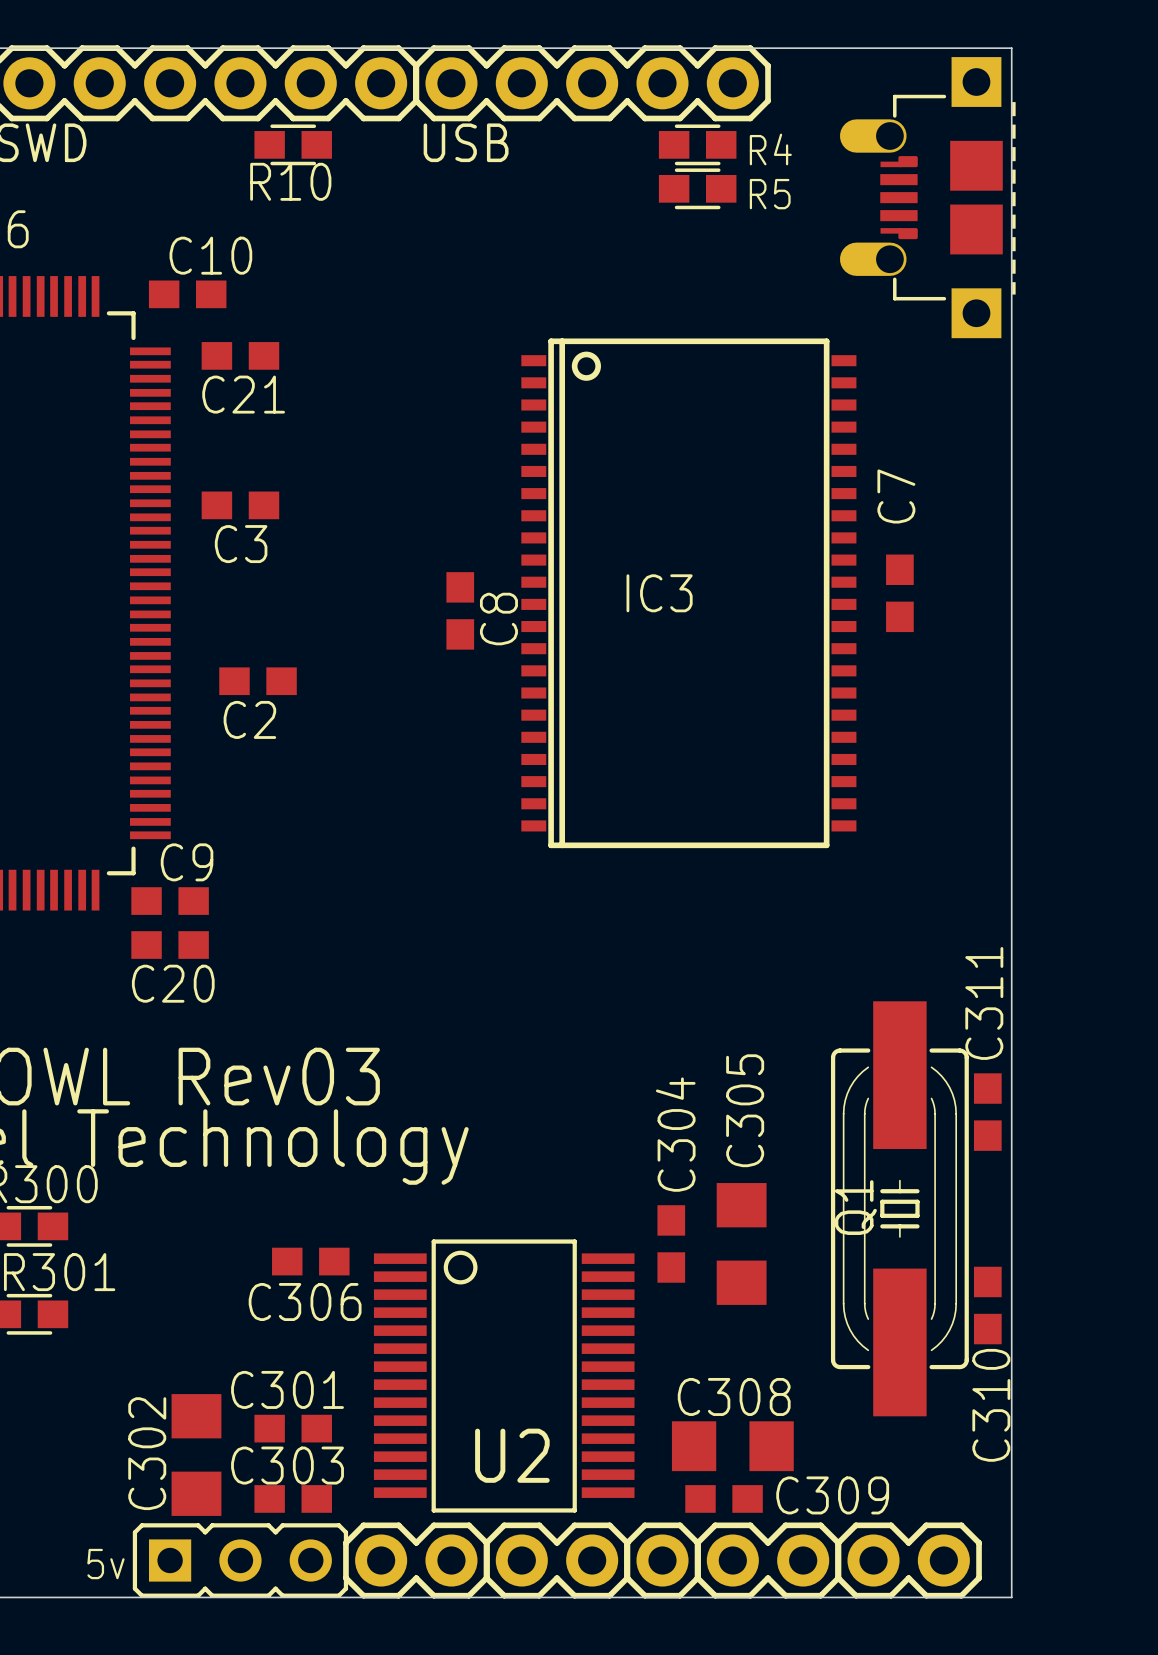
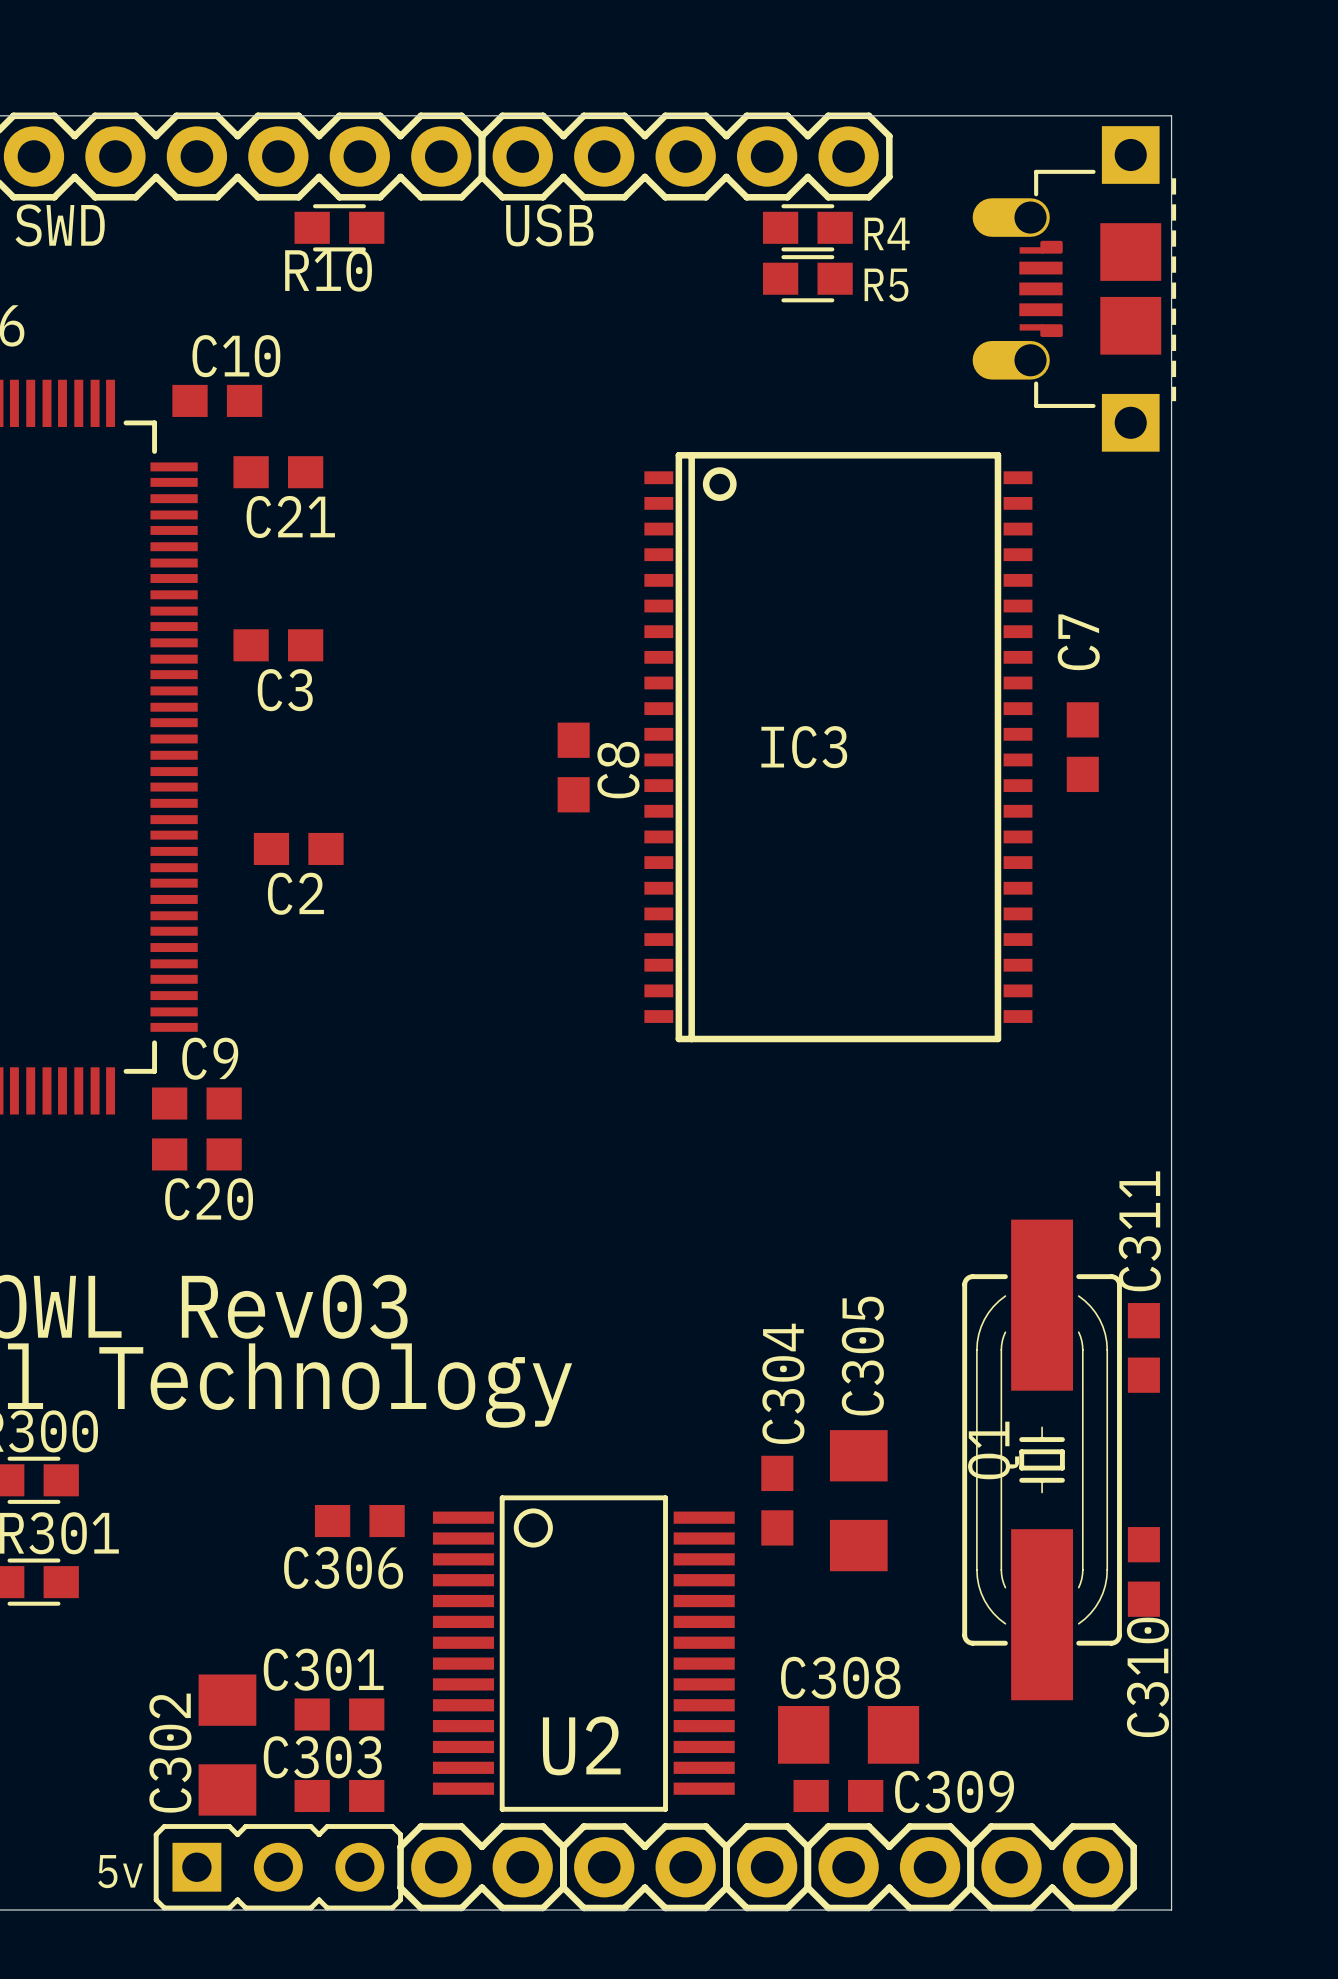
IC3 position: (688, 593) -> (838, 747)
C7 position: (899, 593) -> (1082, 747)
C8 position: (460, 610) -> (573, 767)

